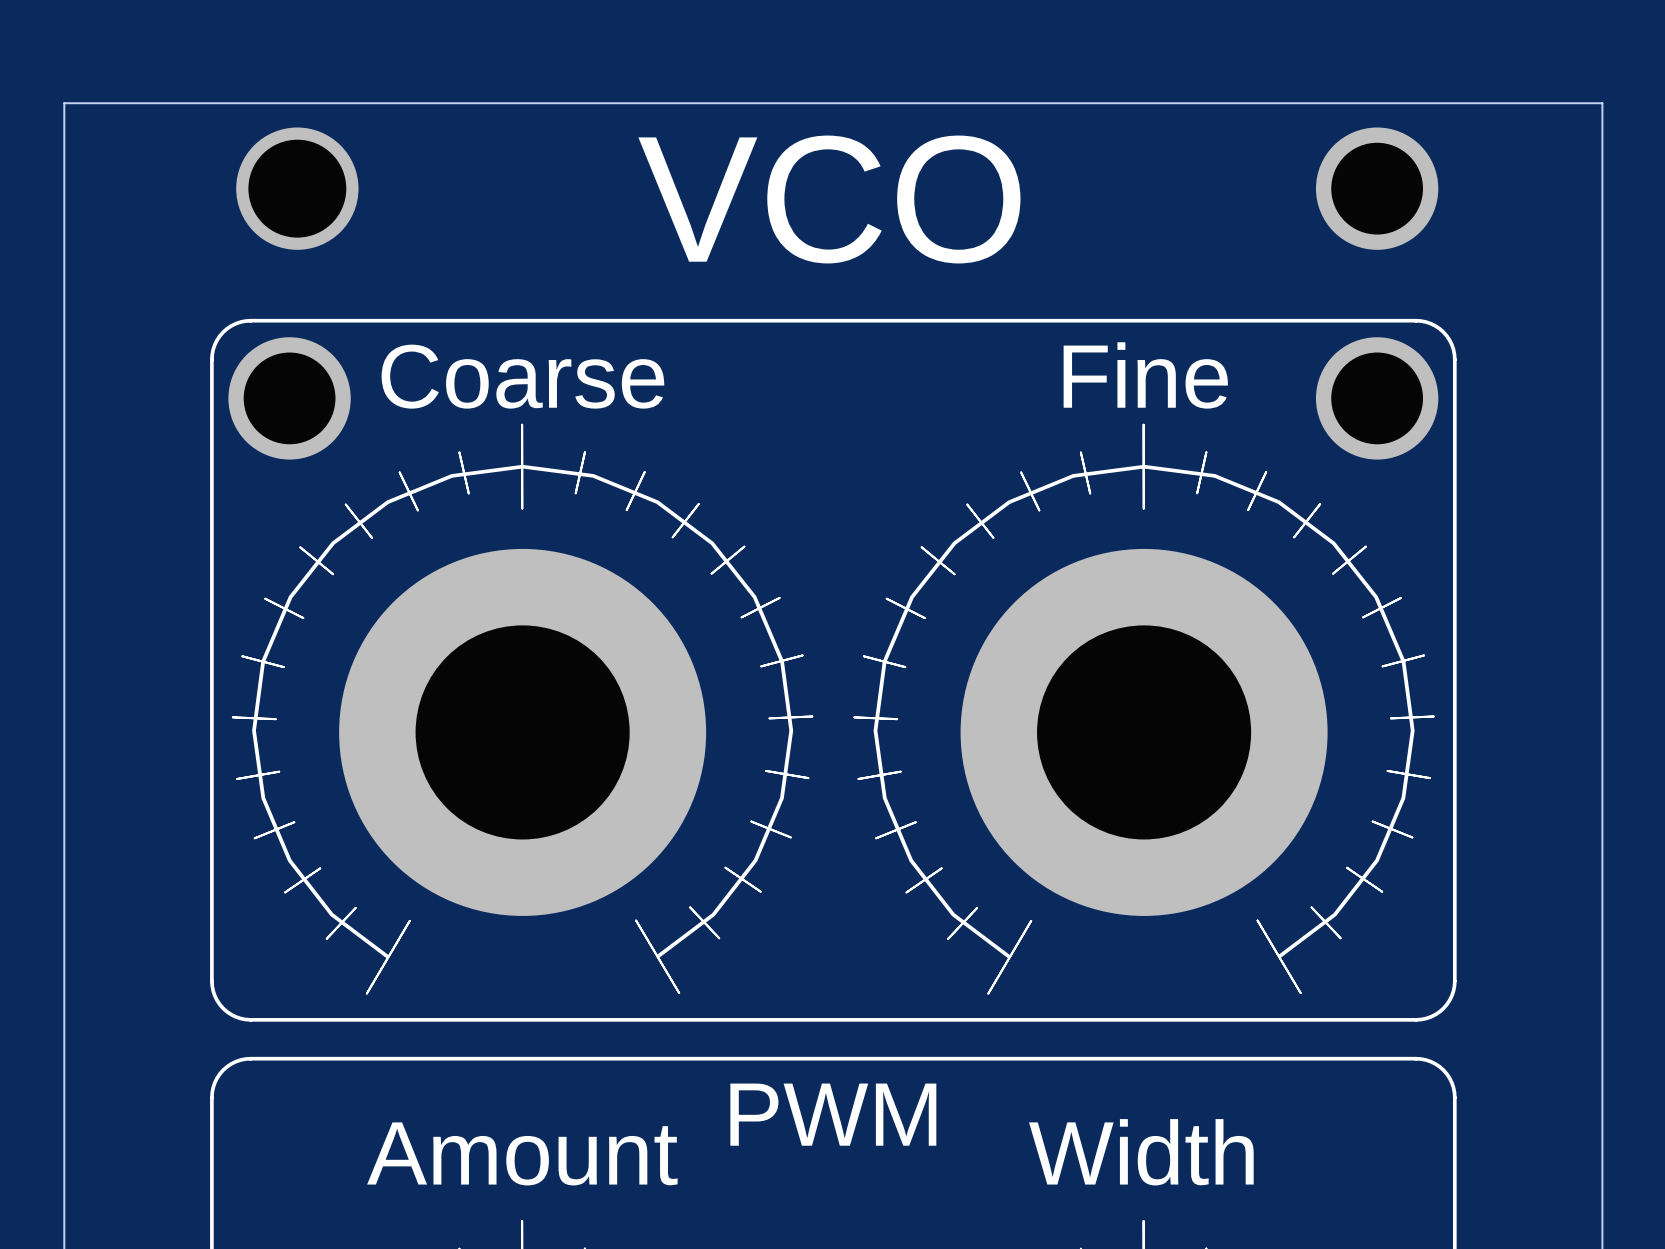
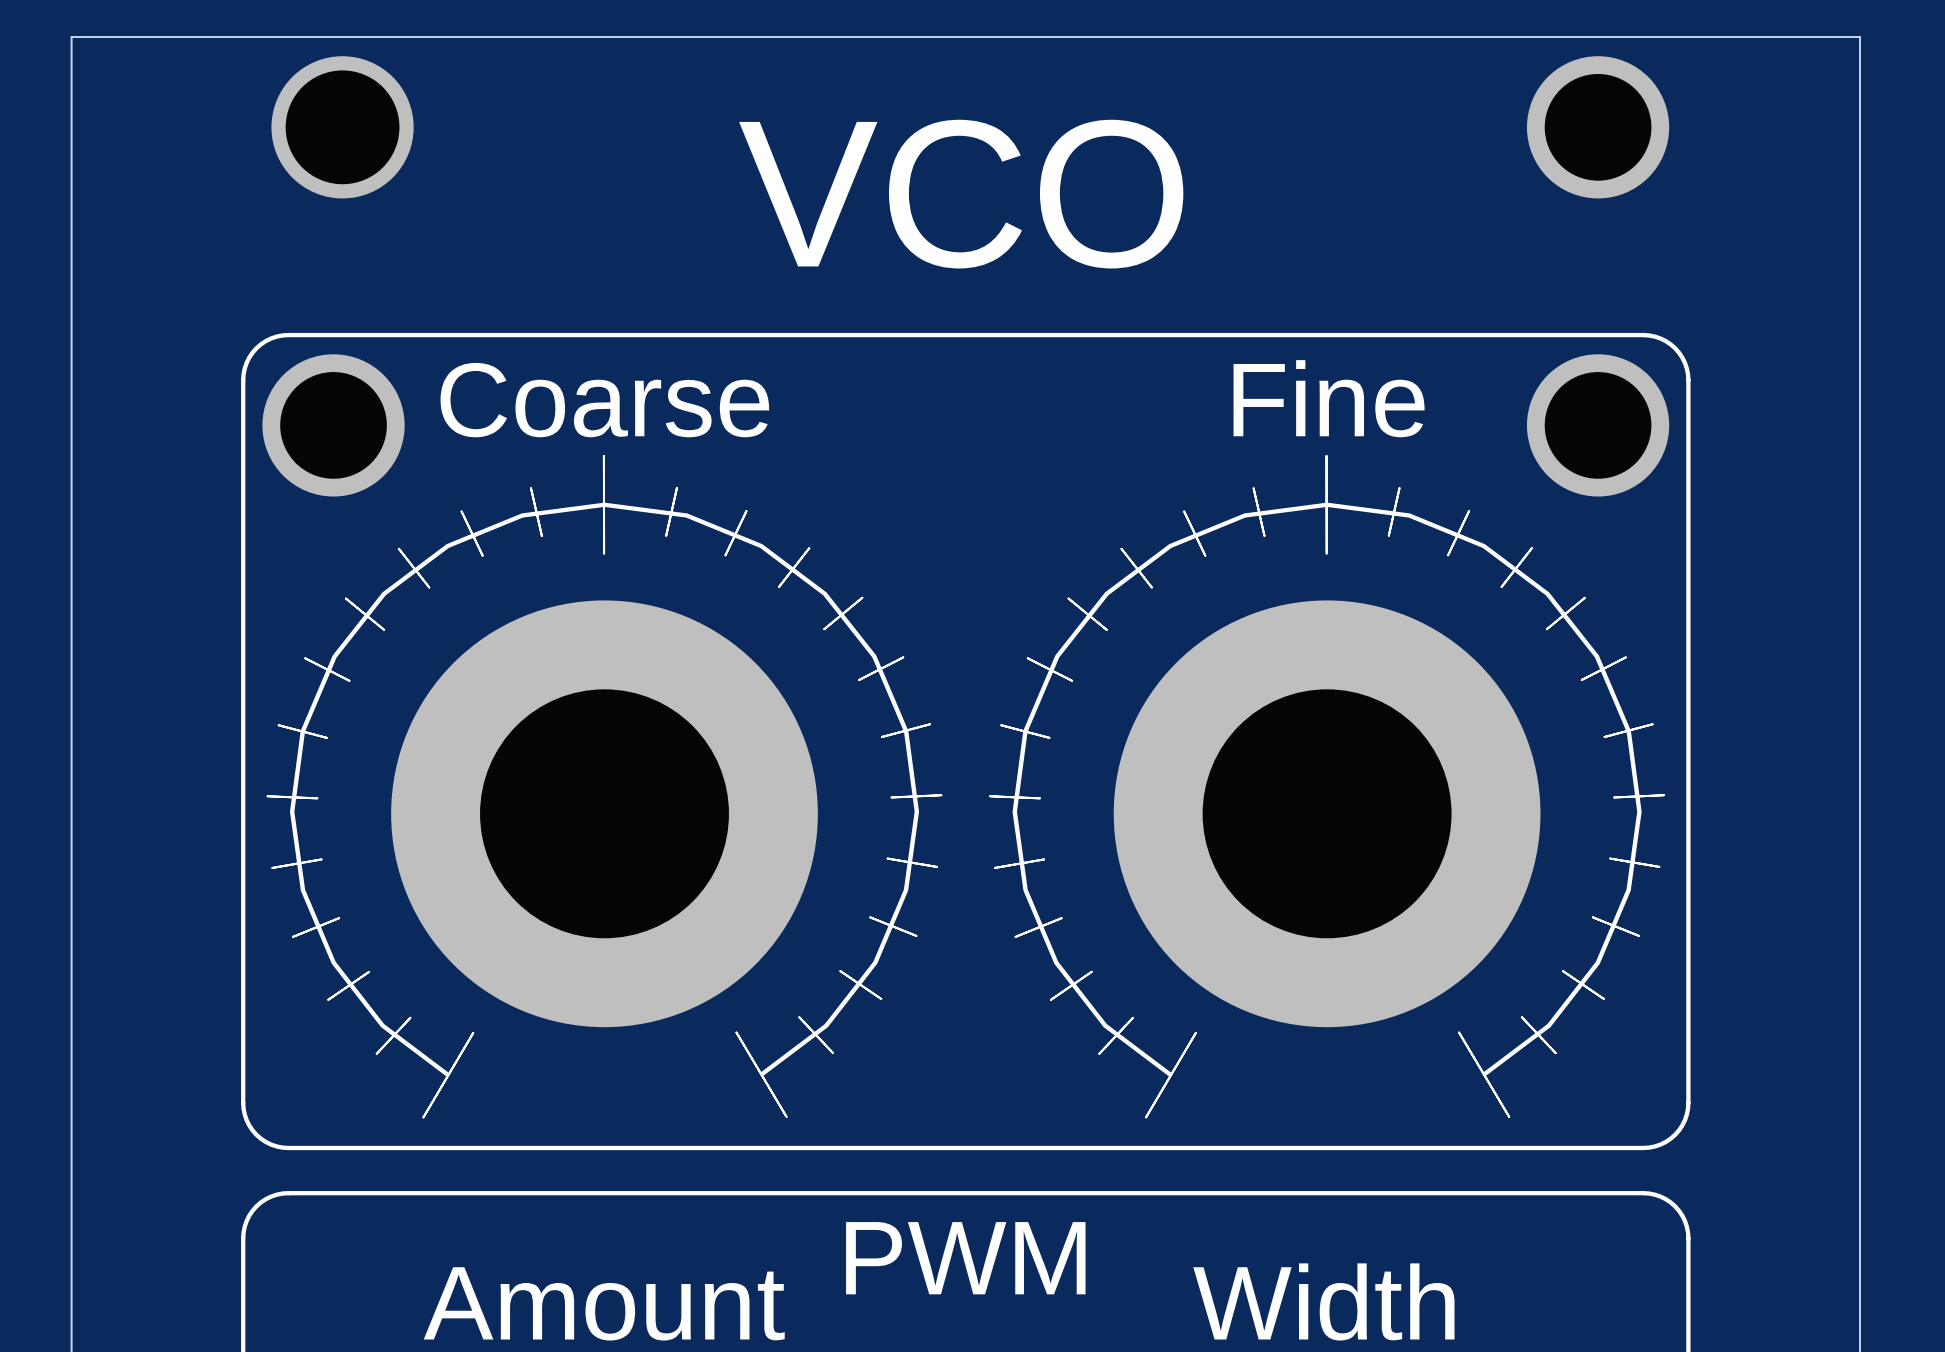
board edge: (64, 103) (1602, 103) -> (71, 82) (71, 37) (1860, 37) (1860, 82)
via position: (297, 188) -> (342, 127)
via position: (1377, 188) -> (1598, 127)

